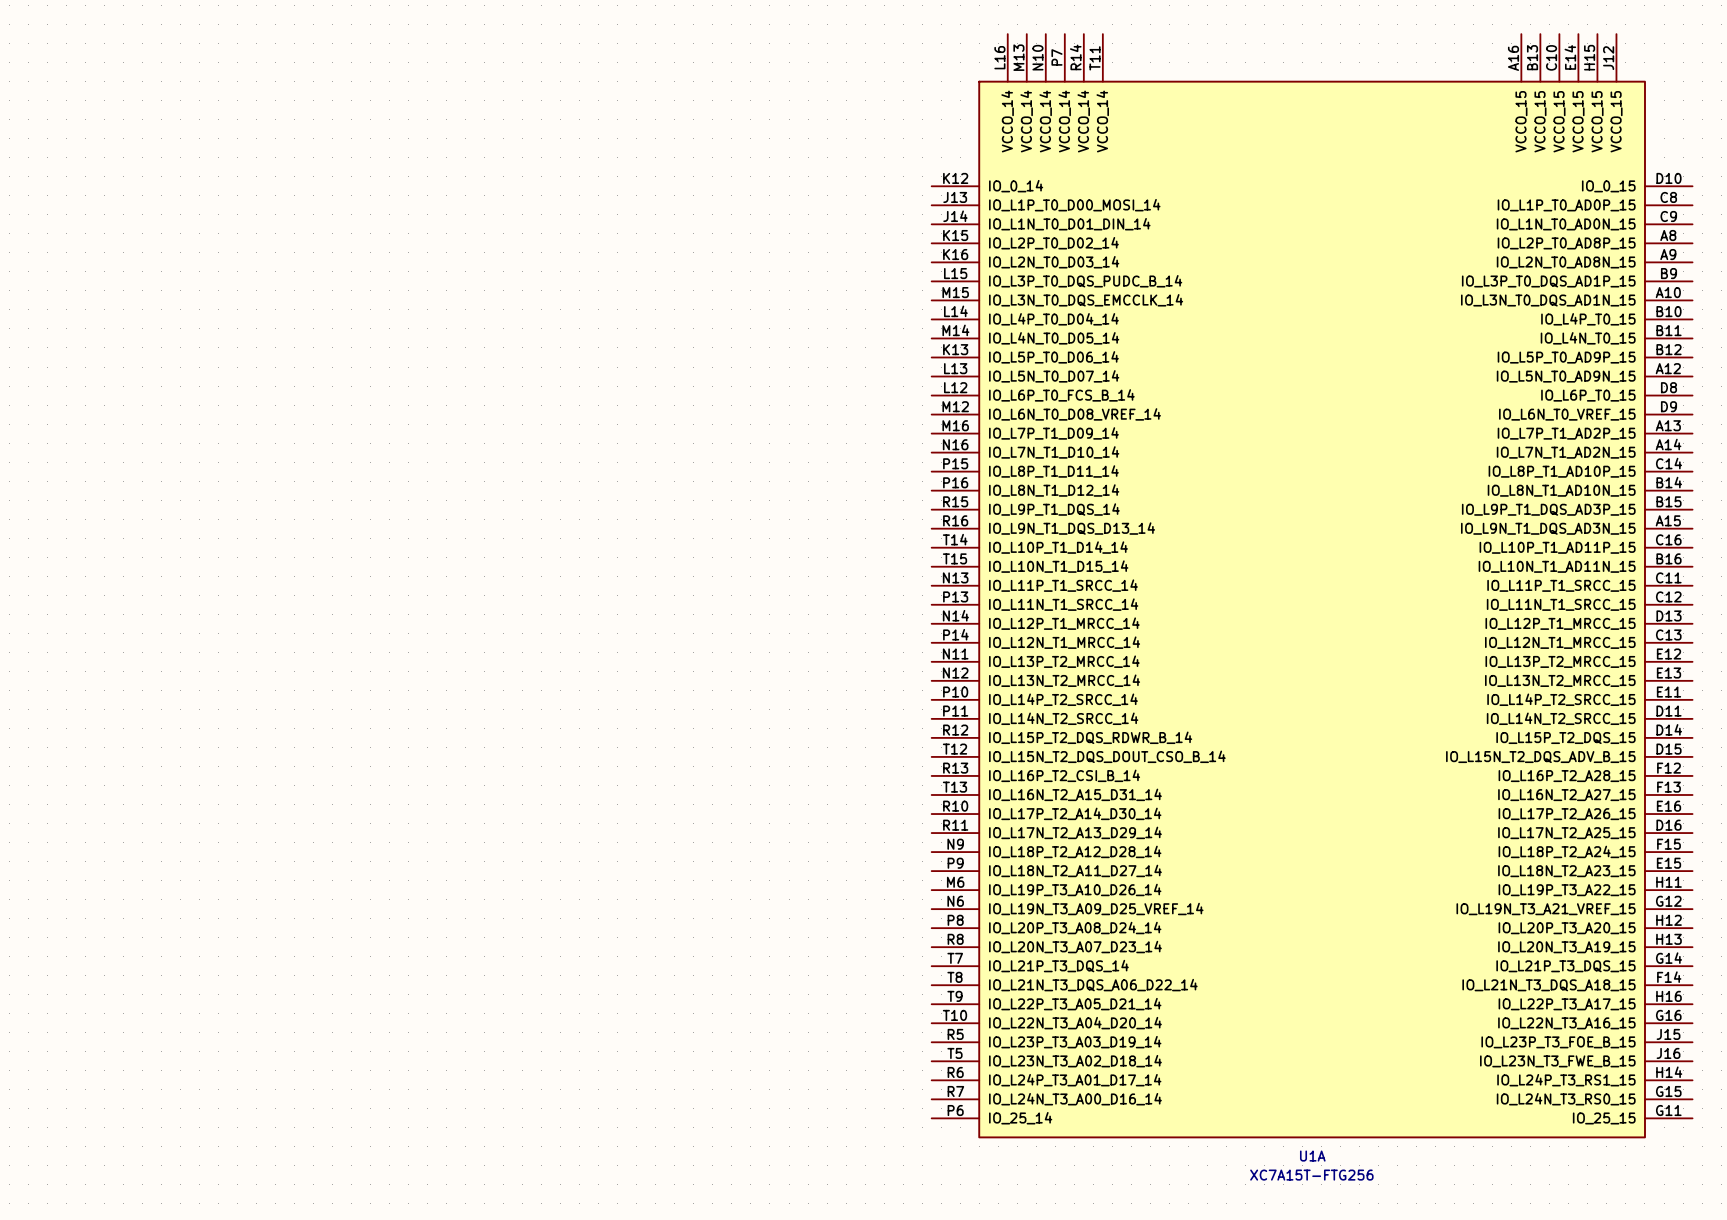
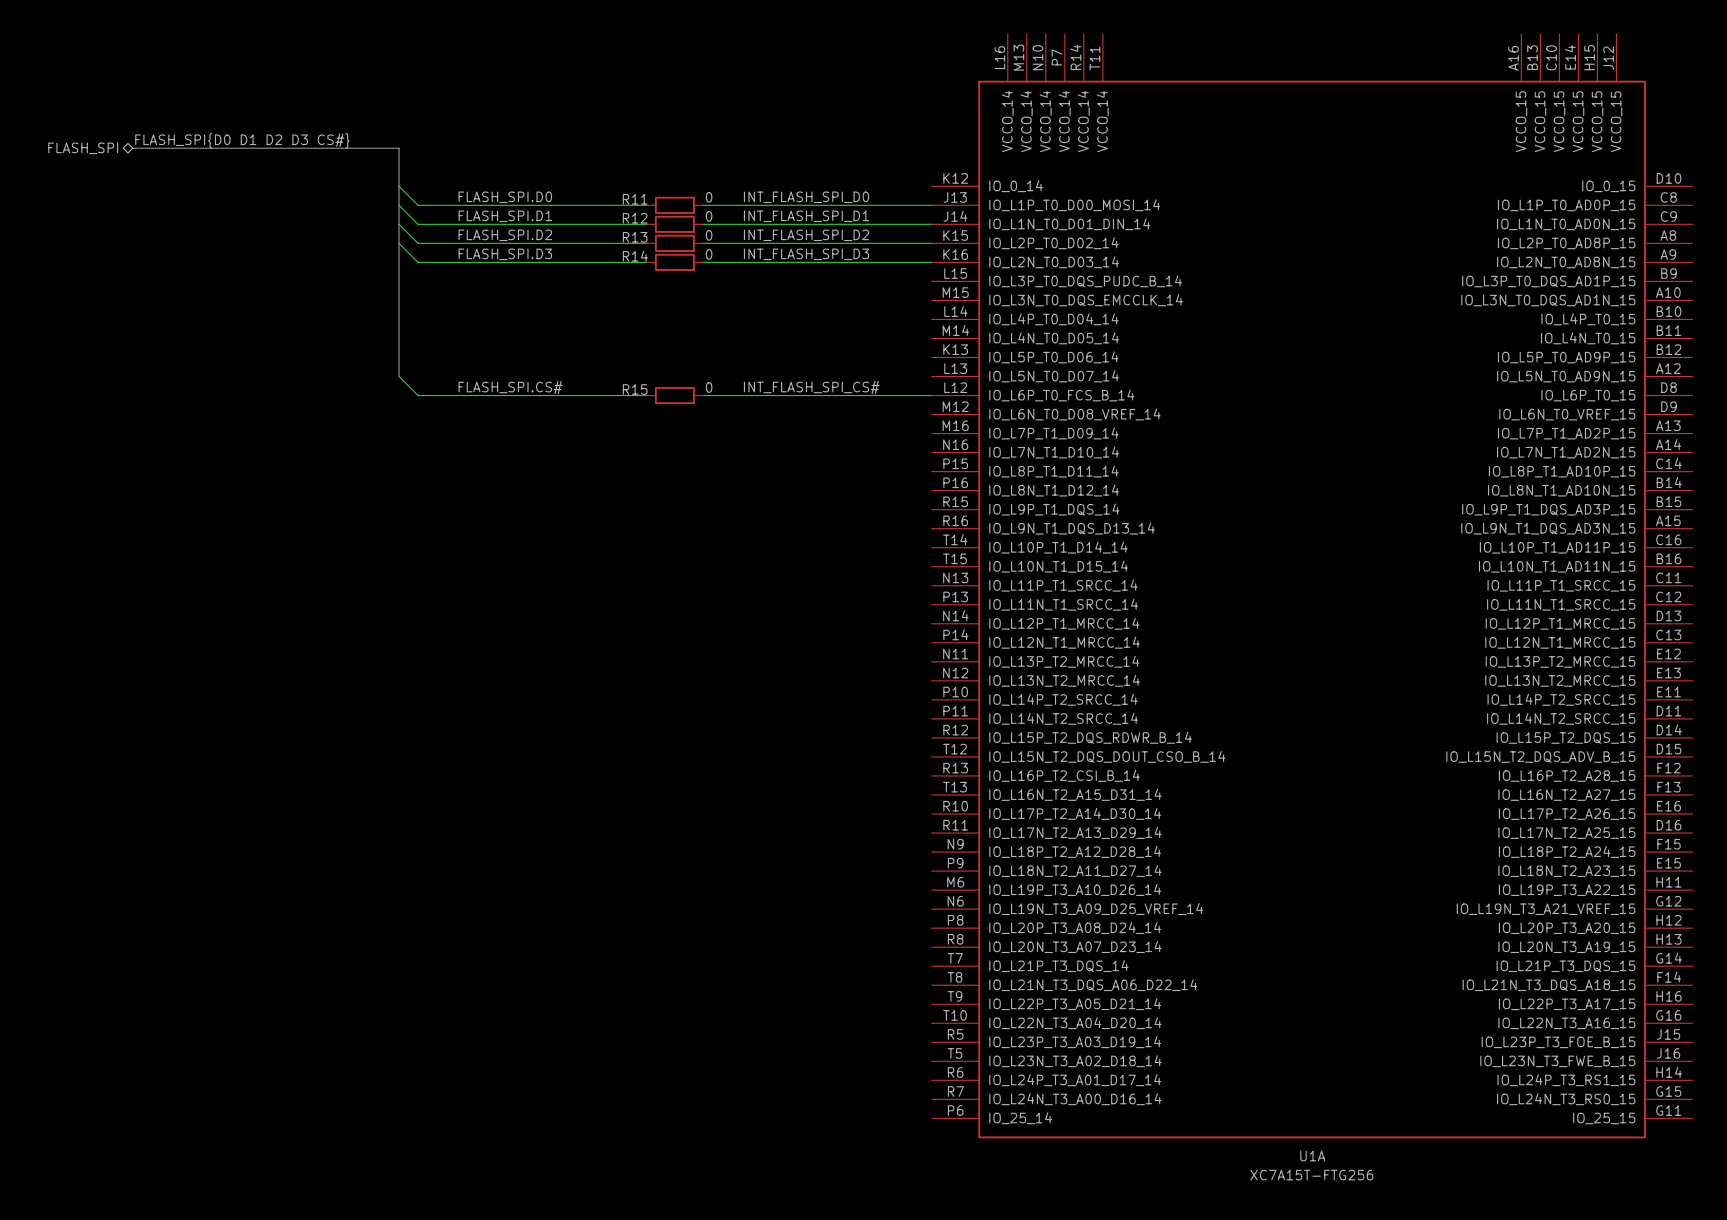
label: none -> FLASH_SPI{D0 D1 D2 D3 CS#} (242, 140)
hierarchical label: none -> FLASH_SPI (83, 148)
bus: none -> (132, 148) (399, 148) (399, 376)
wire: none -> (399, 186) (418, 205) (646, 205)
label: none -> FLASH_SPI.D0 (505, 197)
label: none -> INT_FLASH_SPI_D0 (806, 197)
wire: none -> (399, 205) (418, 224) (646, 224)
R11: none -> 0 (674, 205)
wire: none -> (703, 205) (931, 205)
label: none -> FLASH_SPI.D1 (505, 216)
label: none -> INT_FLASH_SPI_D1 (806, 216)
wire: none -> (399, 224) (418, 243) (646, 243)
R12: none -> 0 (674, 224)
wire: none -> (703, 224) (931, 224)
label: none -> FLASH_SPI.D2 (505, 235)
label: none -> INT_FLASH_SPI_D2 (806, 235)
wire: none -> (399, 243) (418, 262) (646, 262)
R13: none -> 0 (674, 243)
wire: none -> (703, 243) (931, 243)
label: none -> FLASH_SPI.D3 (505, 254)
label: none -> INT_FLASH_SPI_D3 (806, 254)
R14: none -> 0 (674, 262)
wire: none -> (703, 262) (931, 262)
wire: none -> (399, 376) (418, 395) (646, 395)
label: none -> FLASH_SPI.CS# (510, 387)
label: none -> INT_FLASH_SPI_CS# (811, 387)
R15: none -> 0 (674, 395)
wire: none -> (703, 395) (931, 395)

